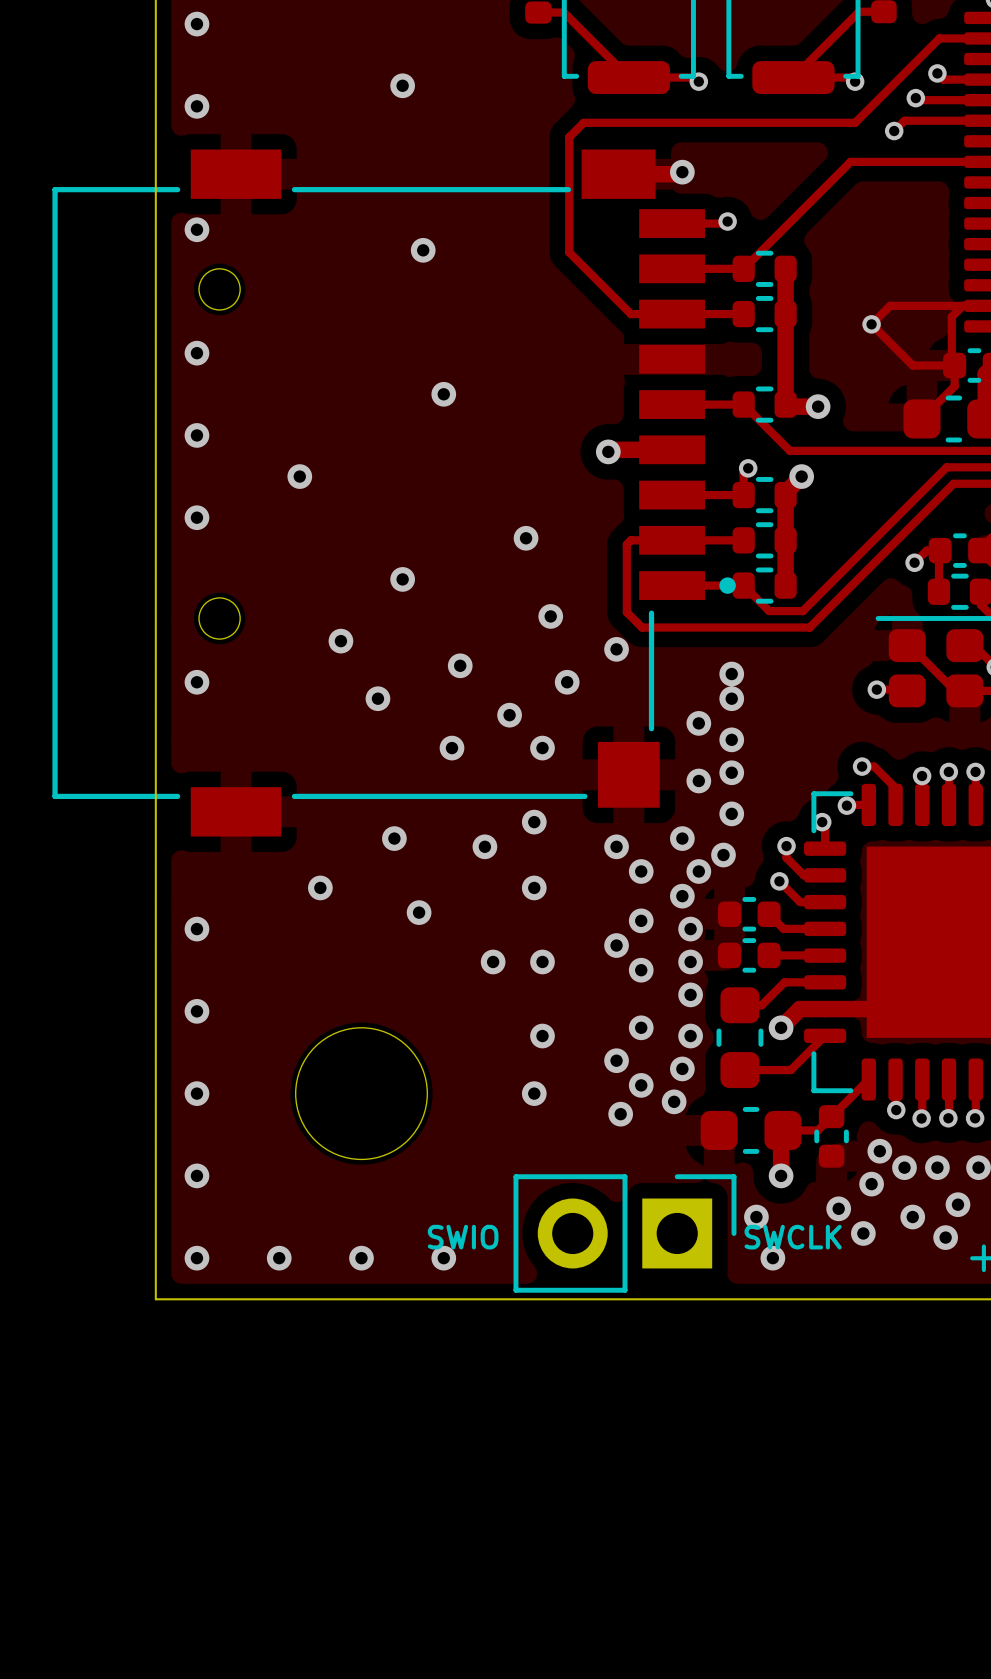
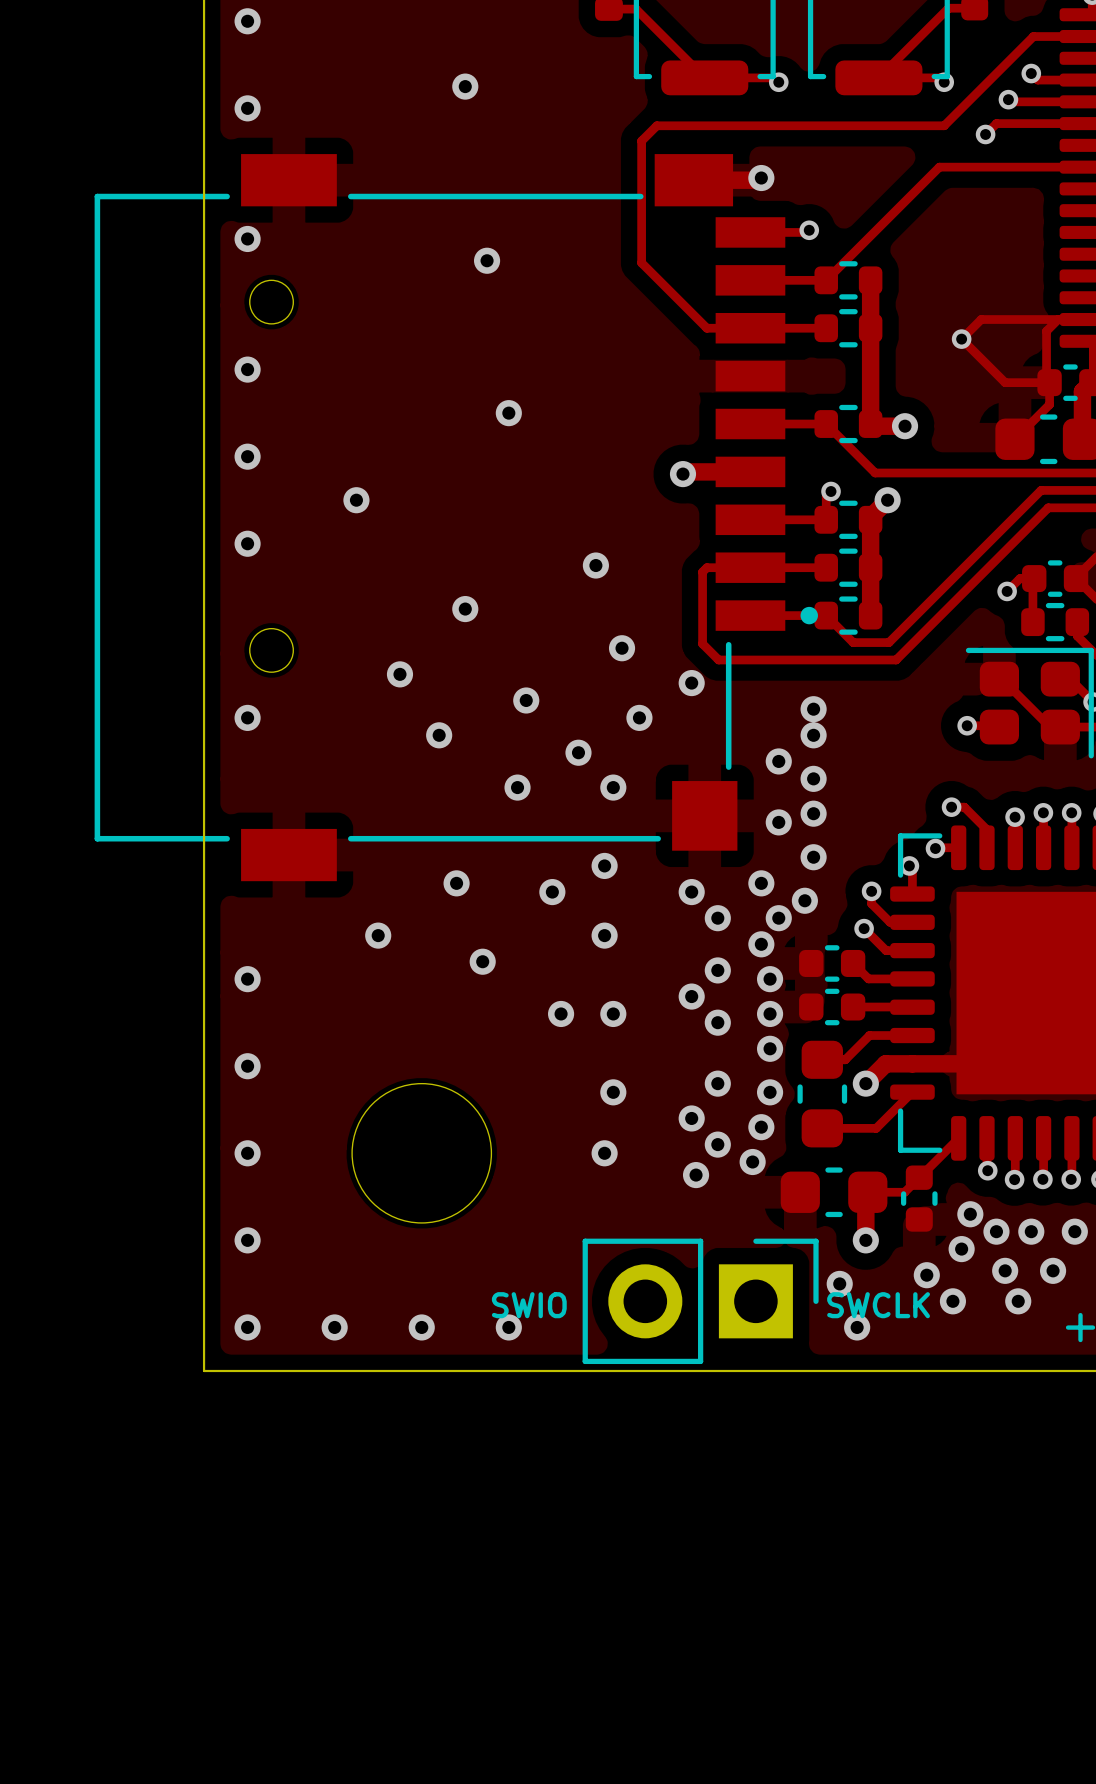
via: none -> (1005, 1270)
via: (912, 1217) -> none
via: none -> (1018, 1301)
via: (945, 1237) -> none

